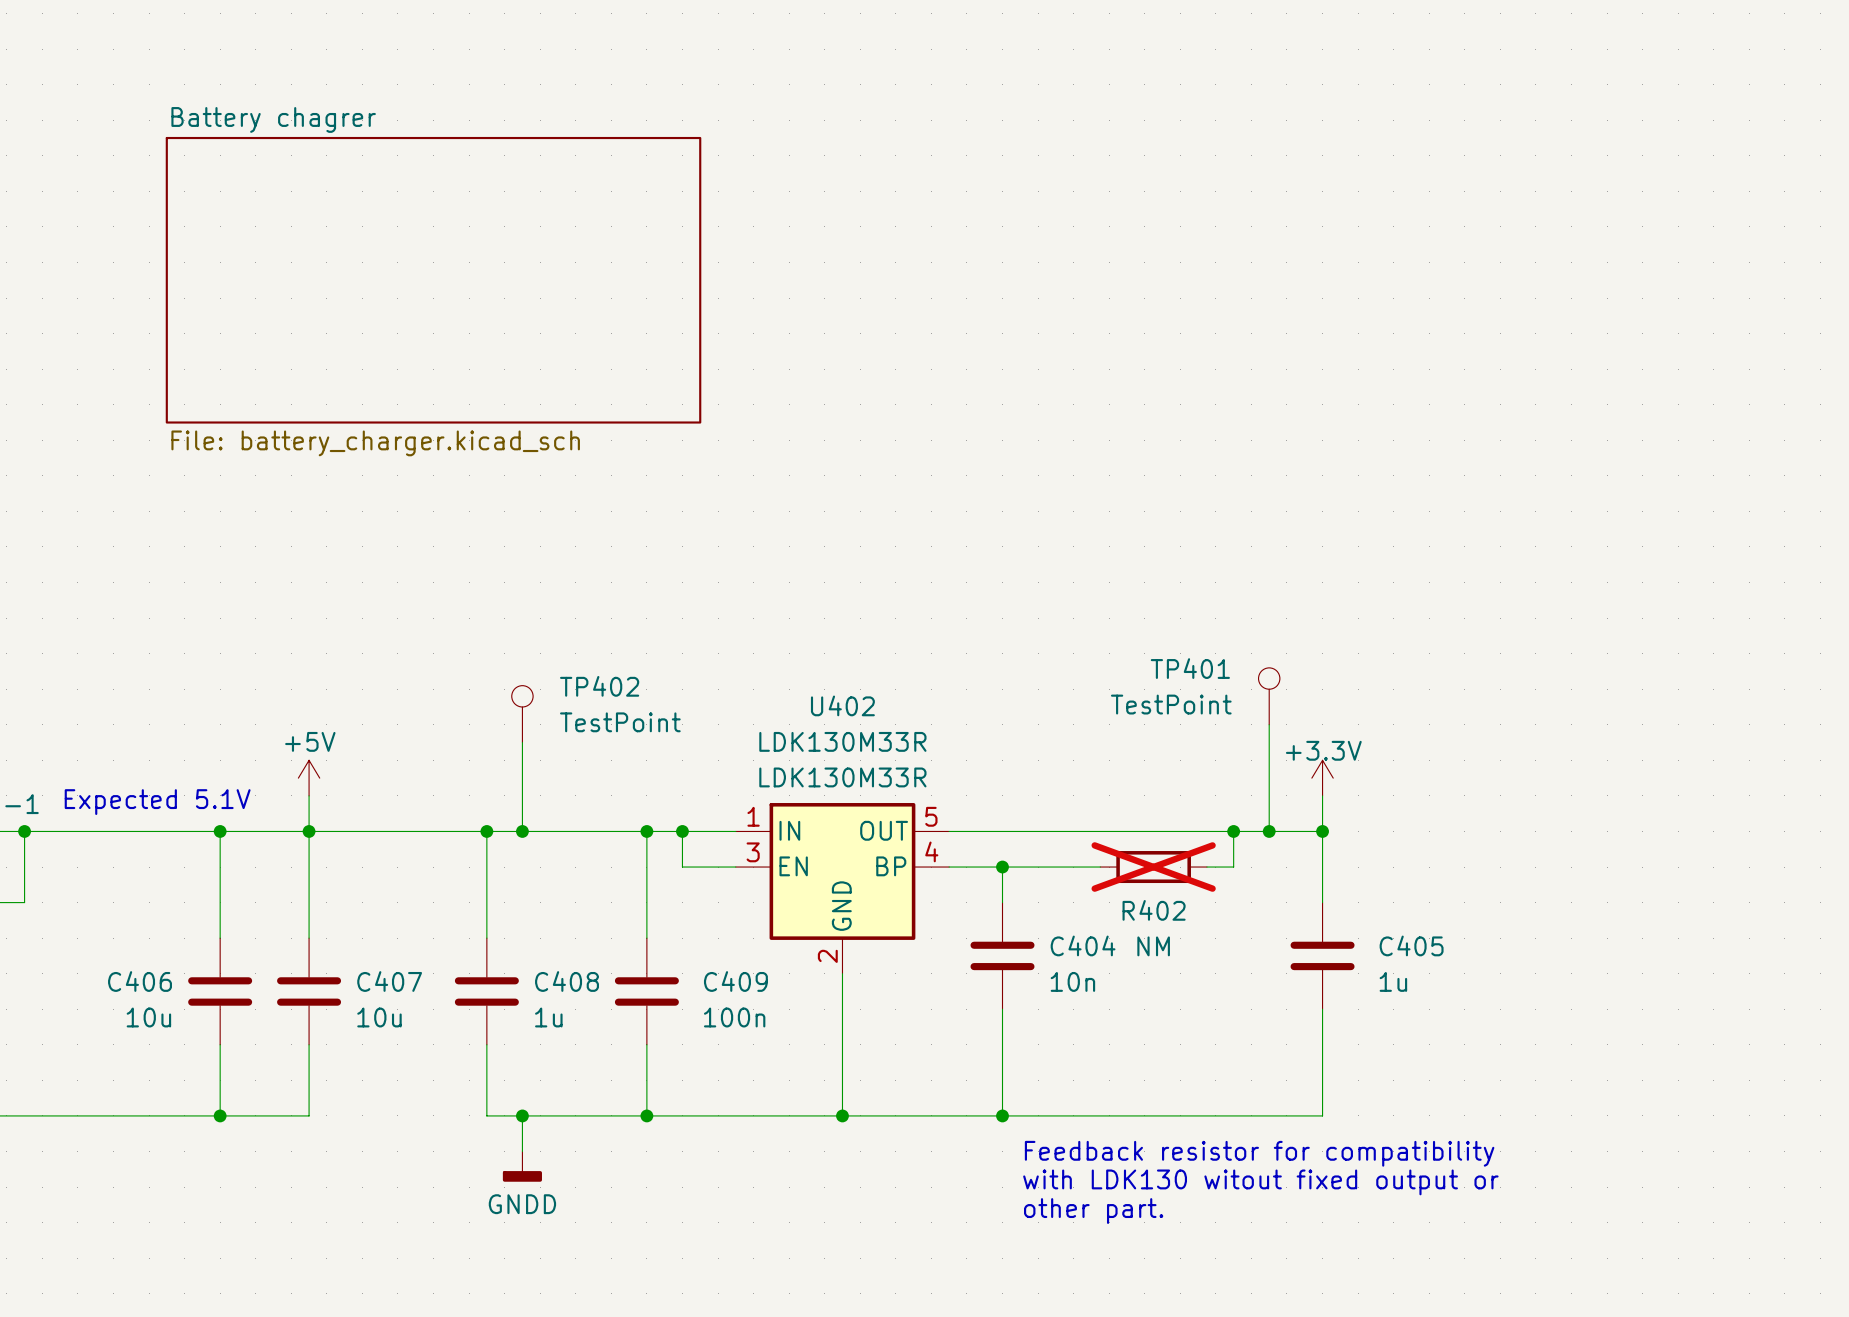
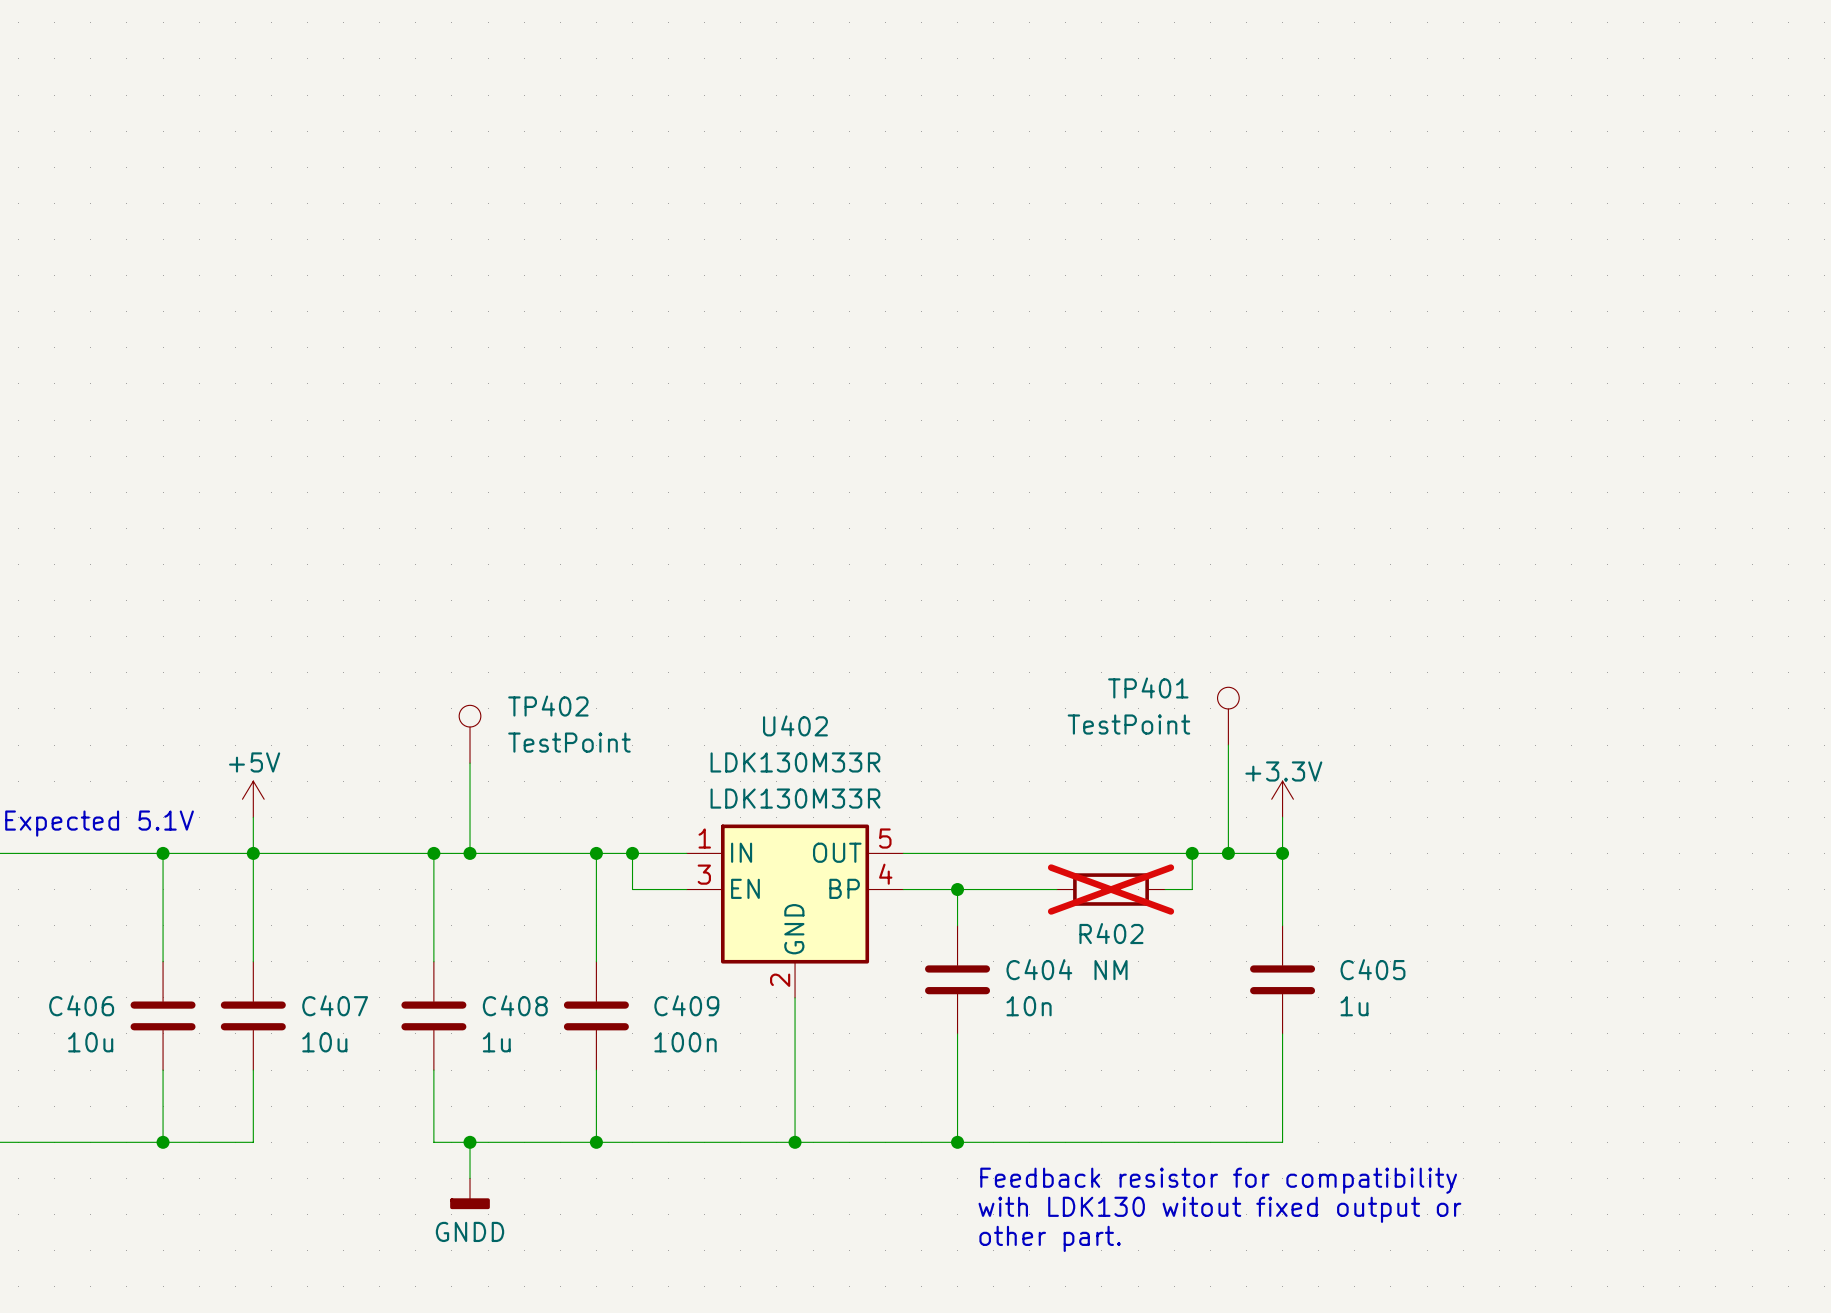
sheet Battery chagrer: File: battery_charger.kicad_sch (433, 280) -> none

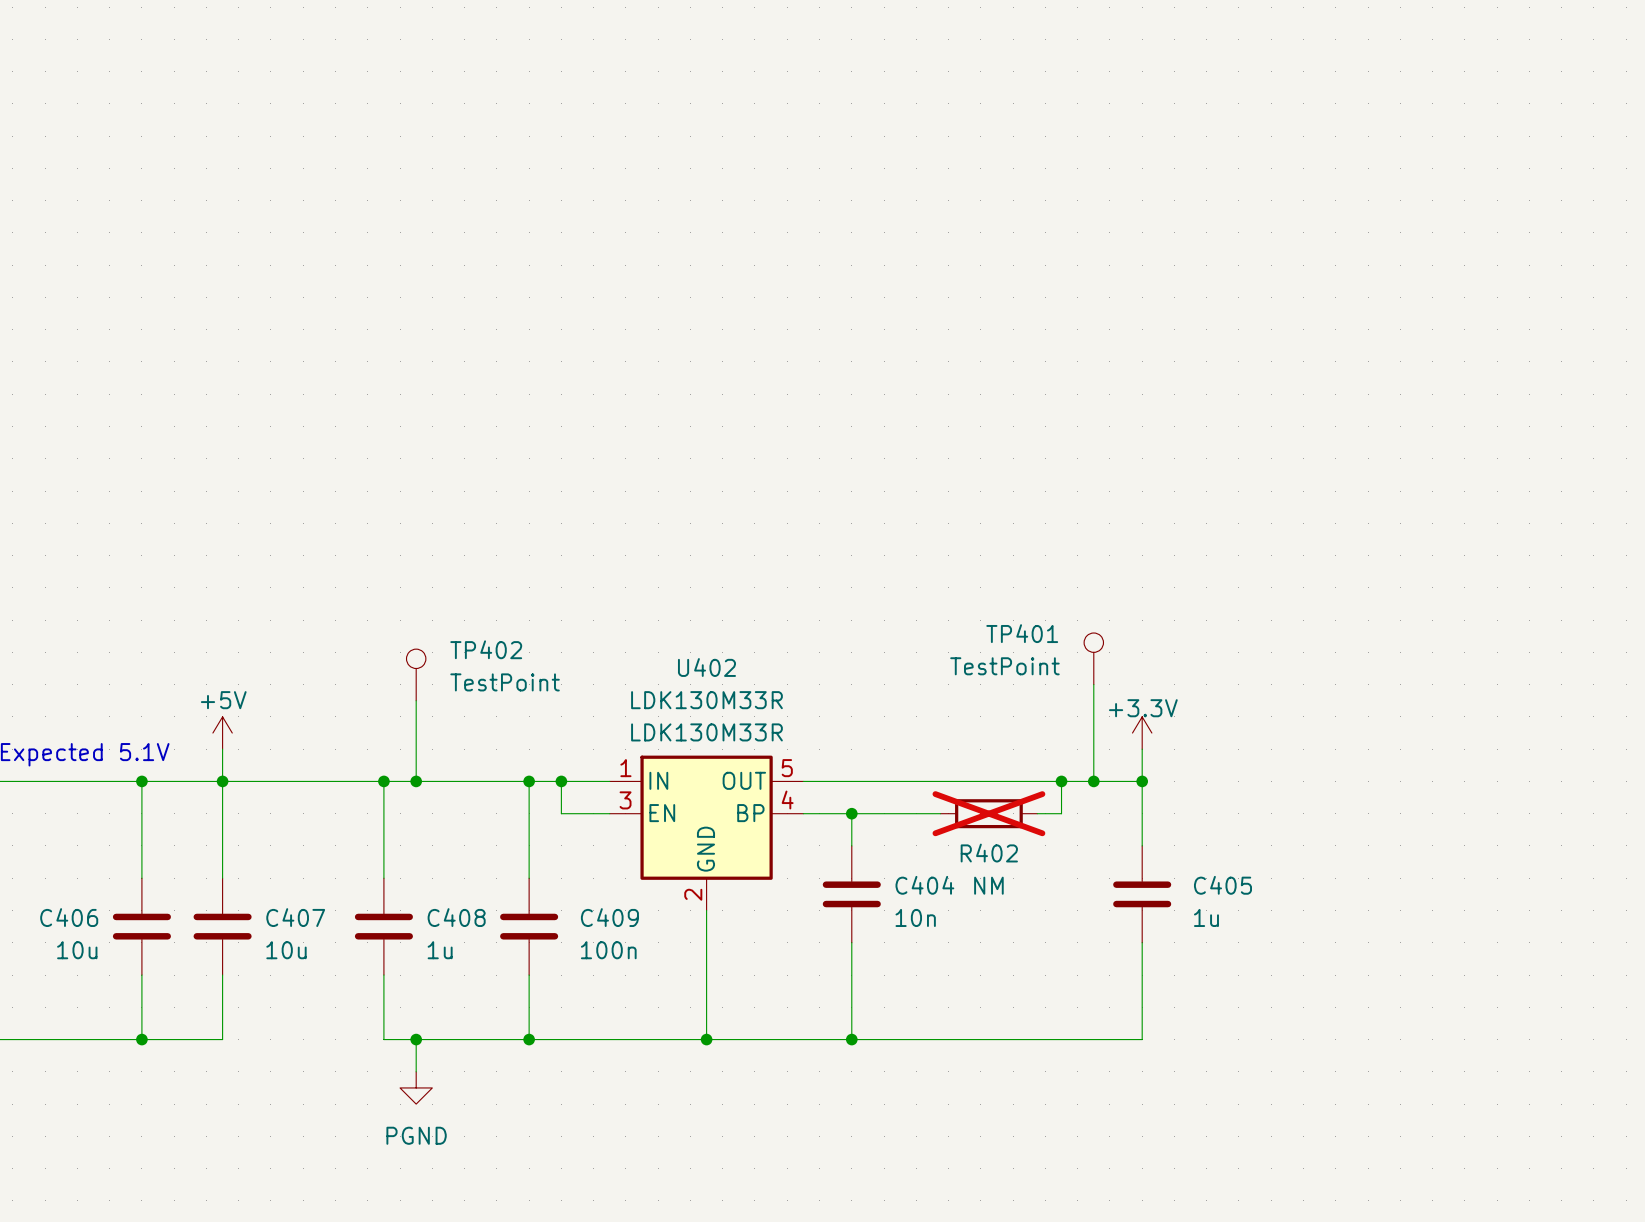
text: Feedback resistor for compatibility (1218, 1180) -> none
power symbol: GNDD (470, 1193) -> PGND (416, 1087)
text: with LDK130 witout fixed output or (1219, 1209) -> none
text: other part. (1050, 1238) -> none

